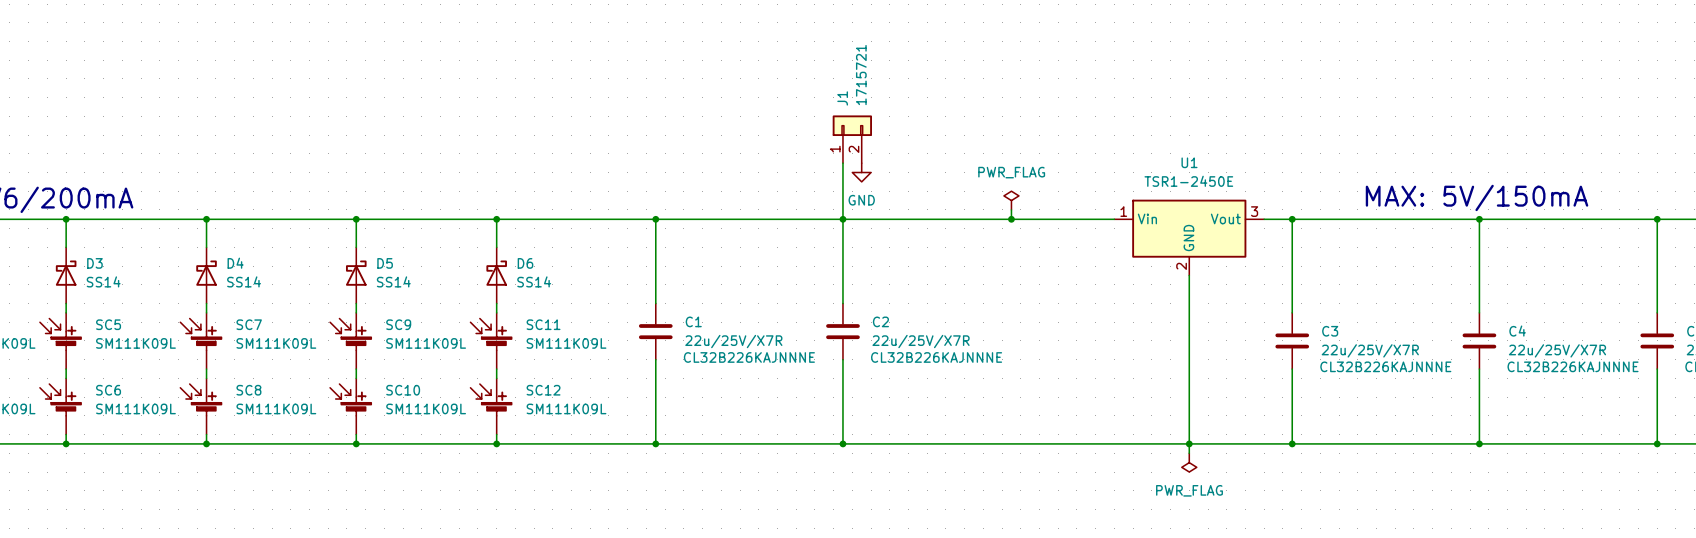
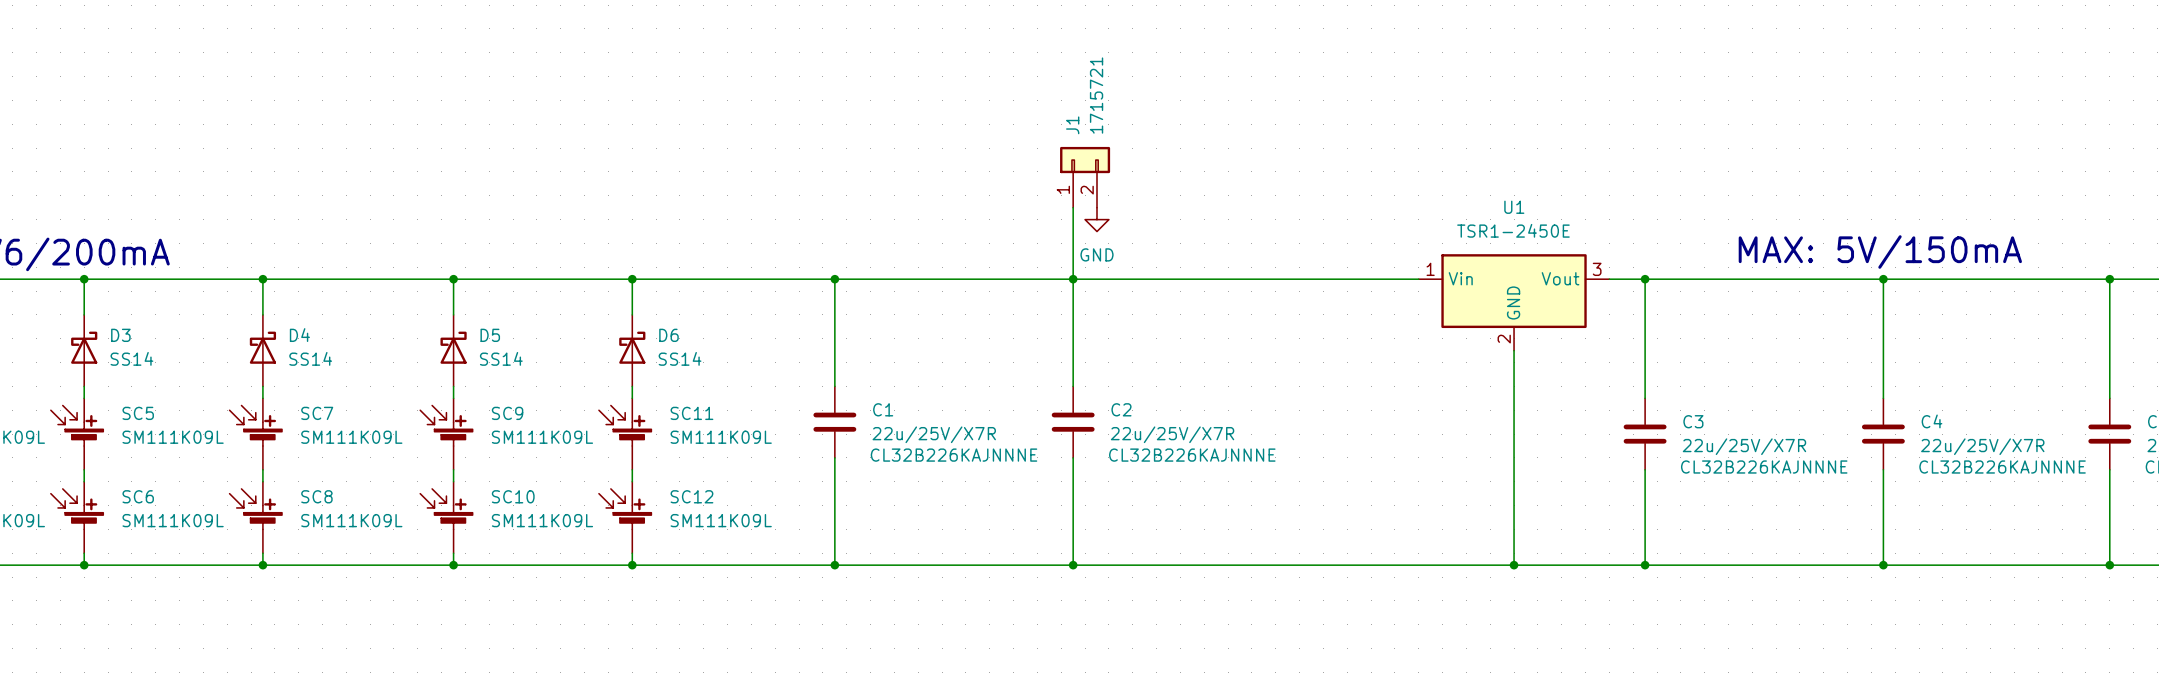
power symbol: PWR_FLAG (1011, 200) -> none
wire: (1011, 209) (1011, 219) -> none
junction: (1011, 219) -> none
wire: (1189, 443) (1189, 453) -> none
power symbol: PWR_FLAG (1189, 462) -> none

